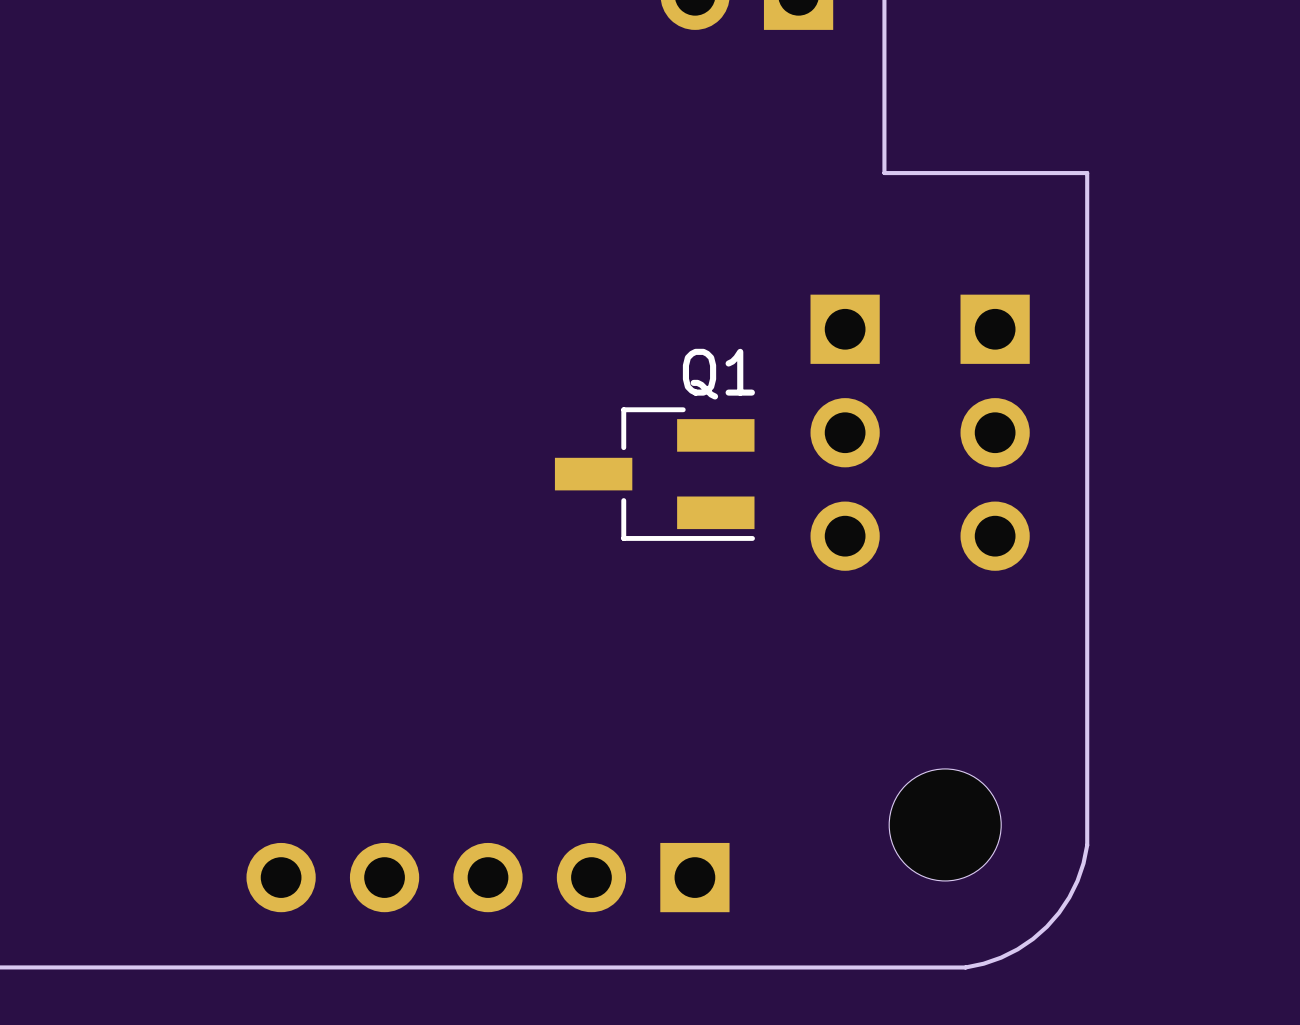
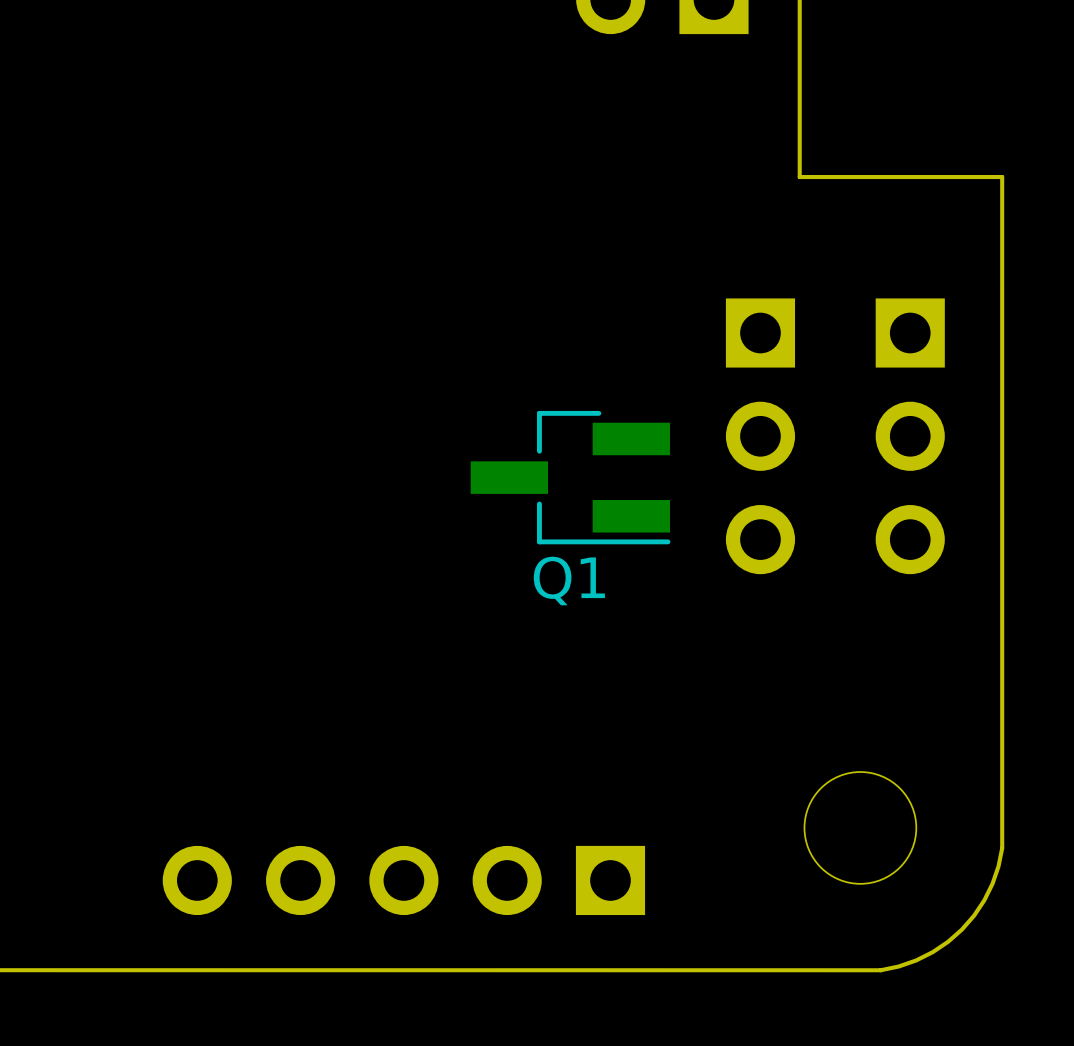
Q1 name position: Q1 (718, 374) -> Q1 (569, 580)

